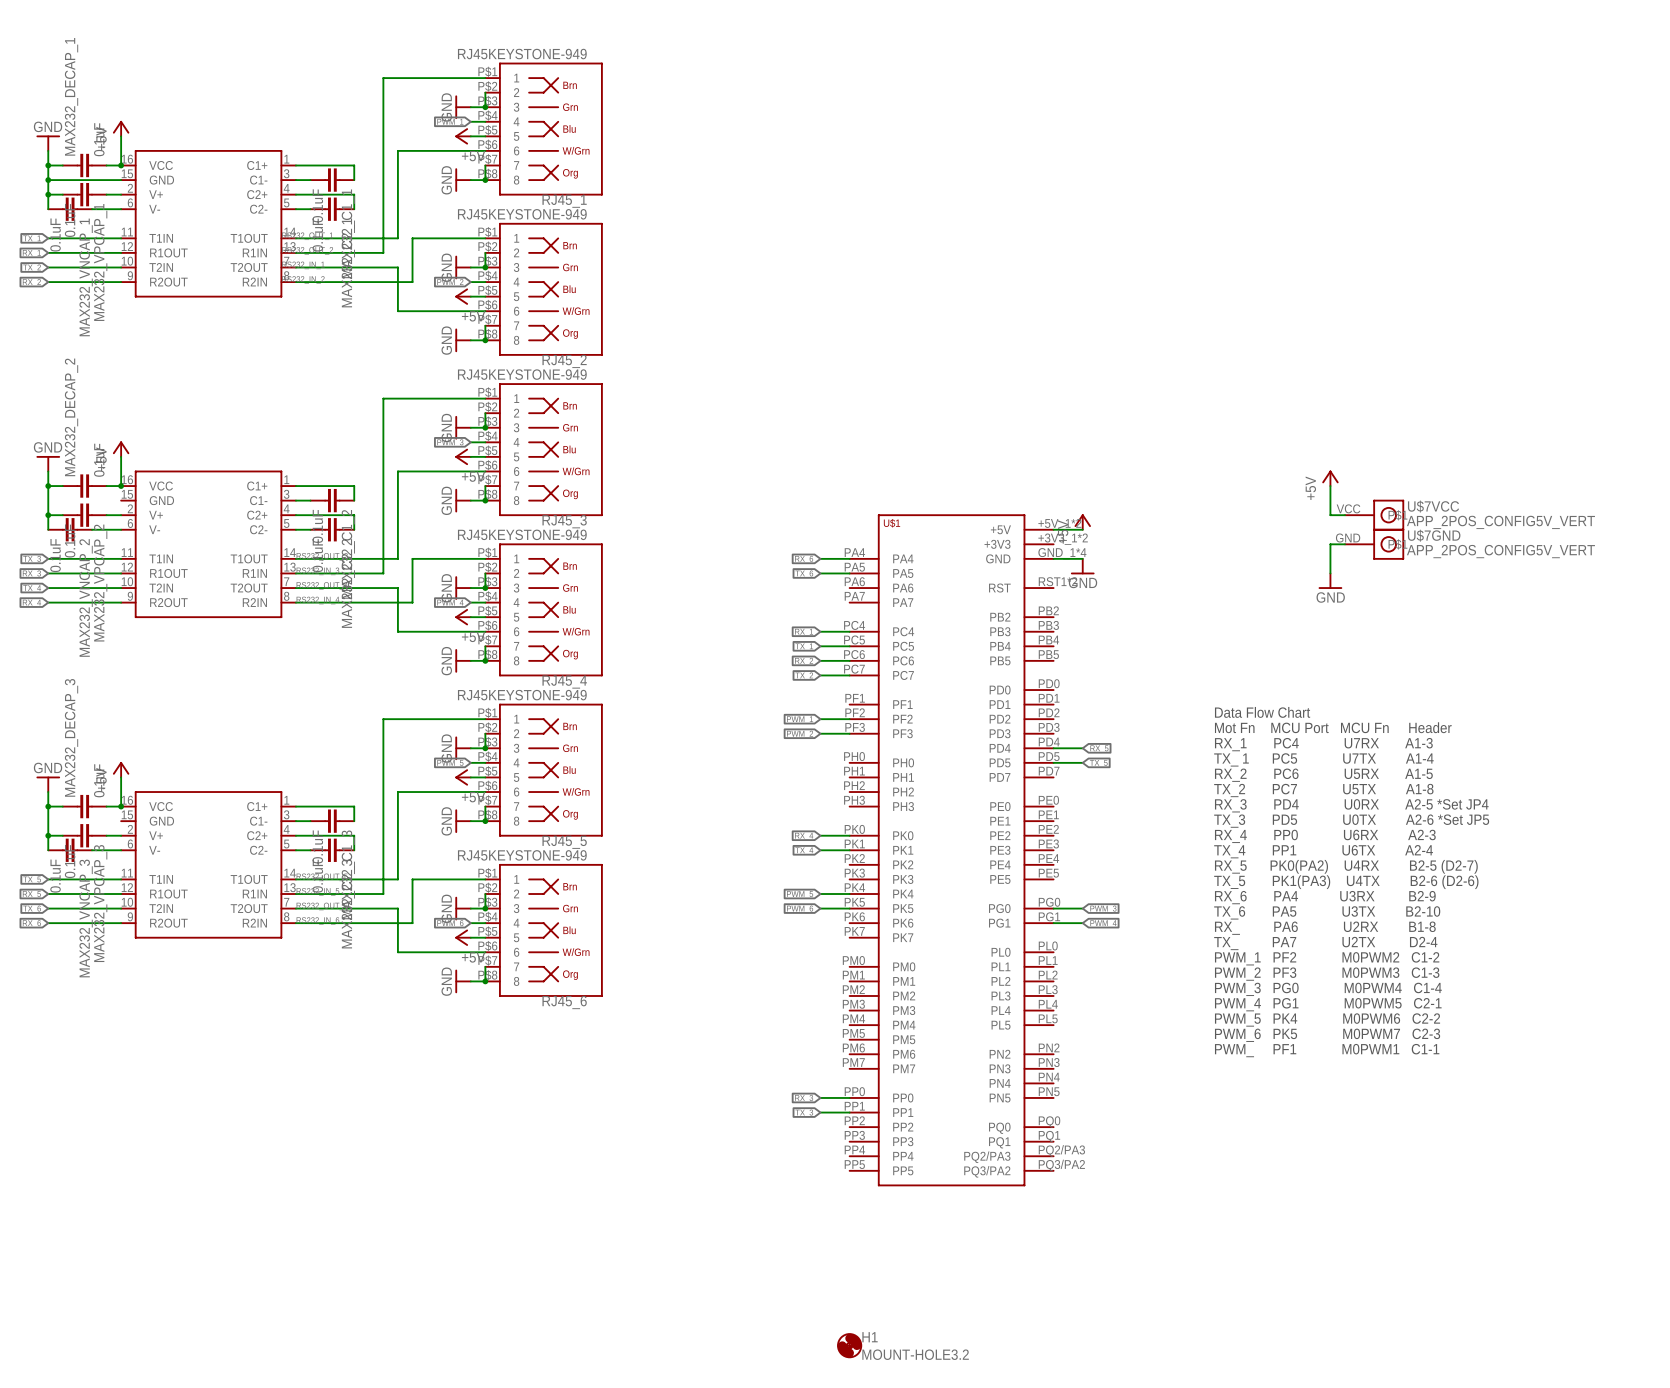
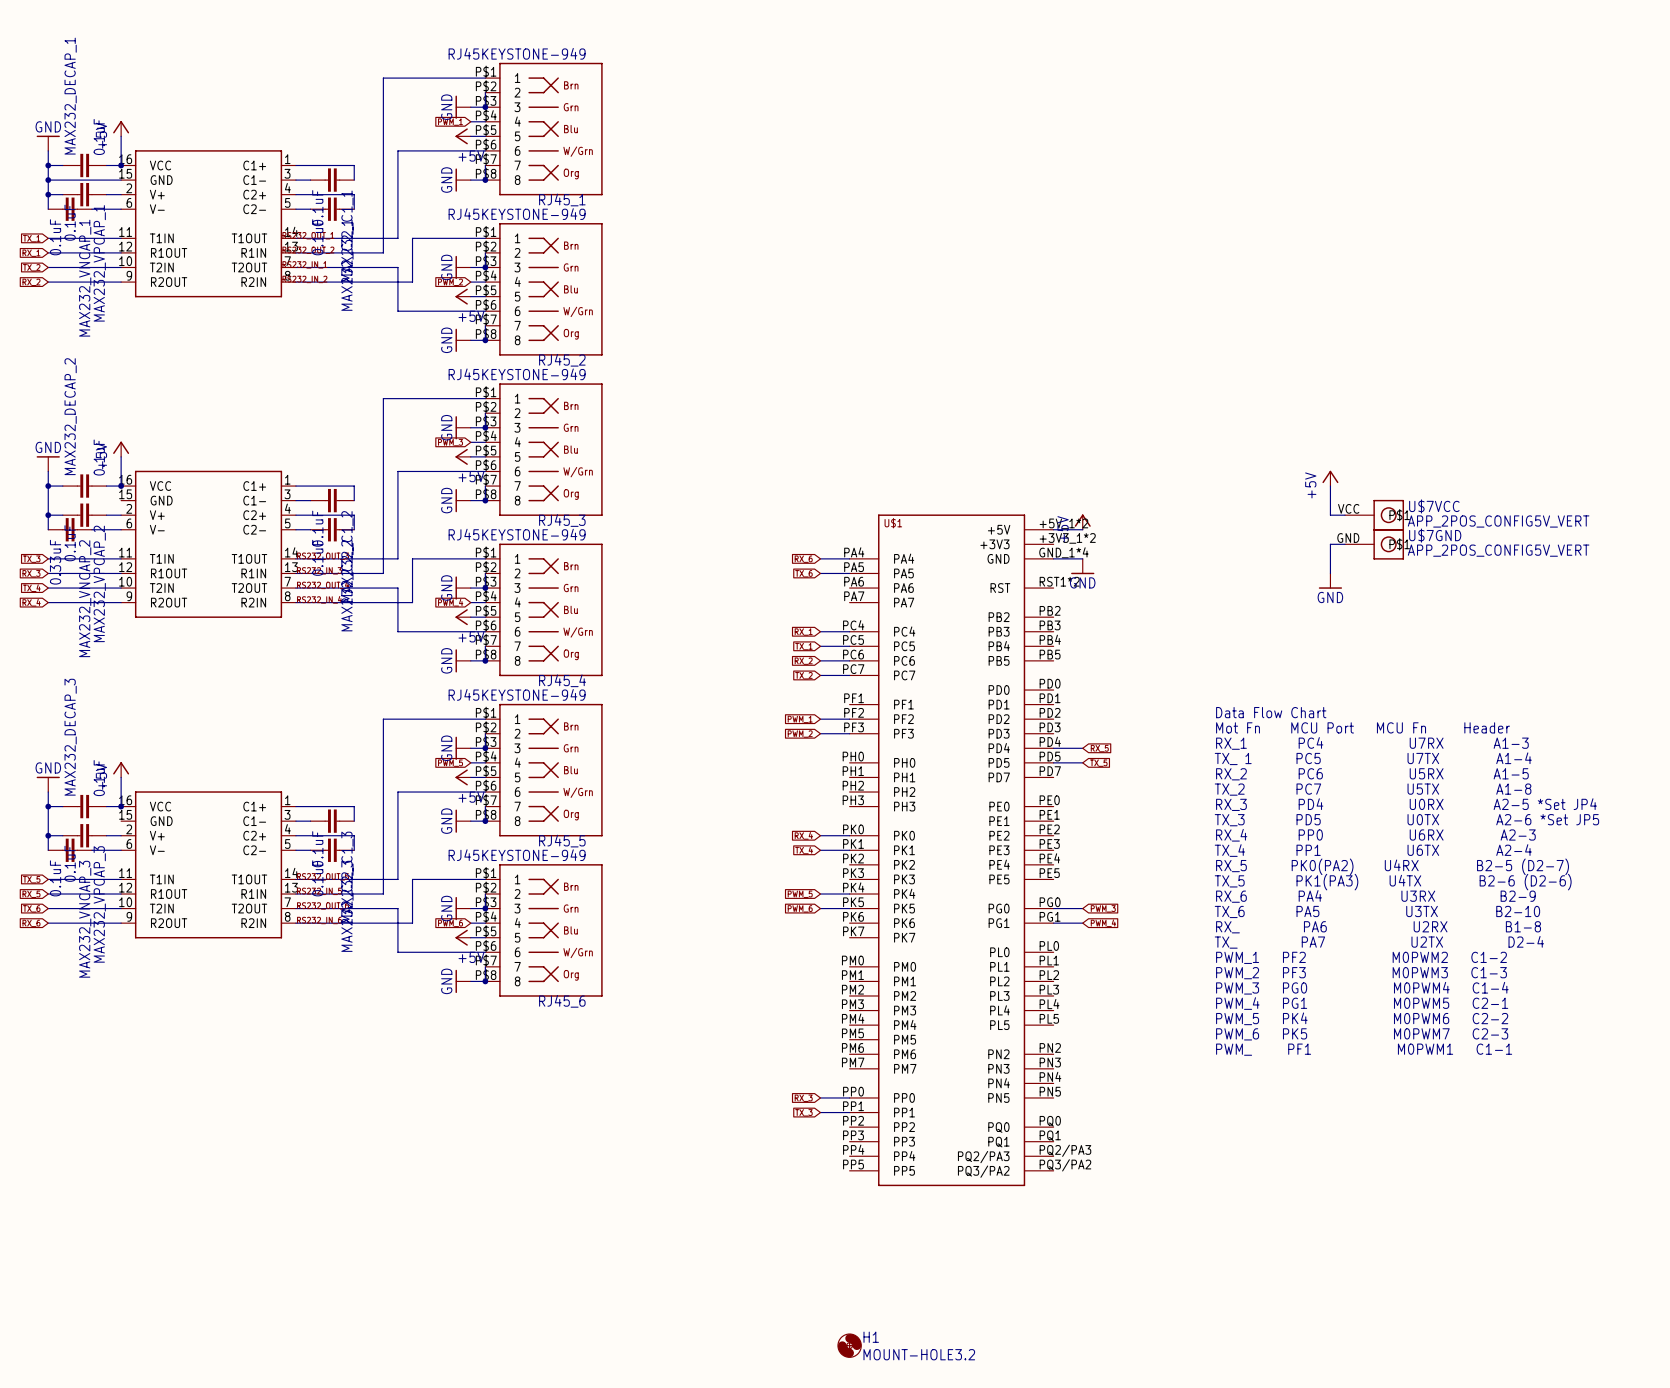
MAX232_VNCAP_2 value: 0.1uF (55, 555) -> 0.33uF (55, 562)

